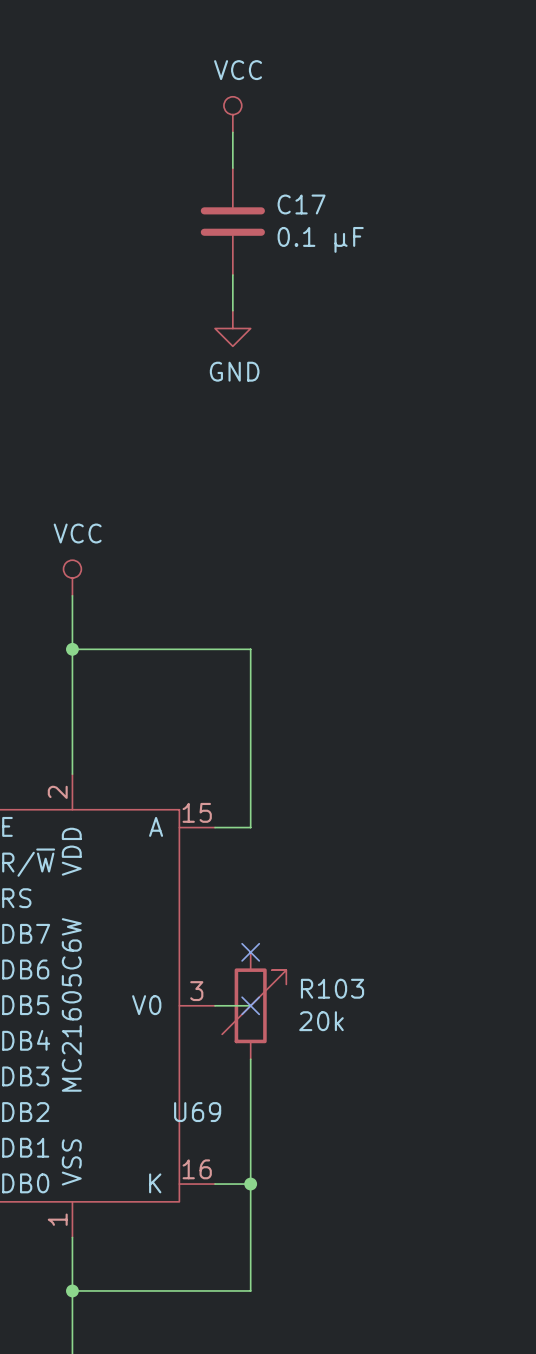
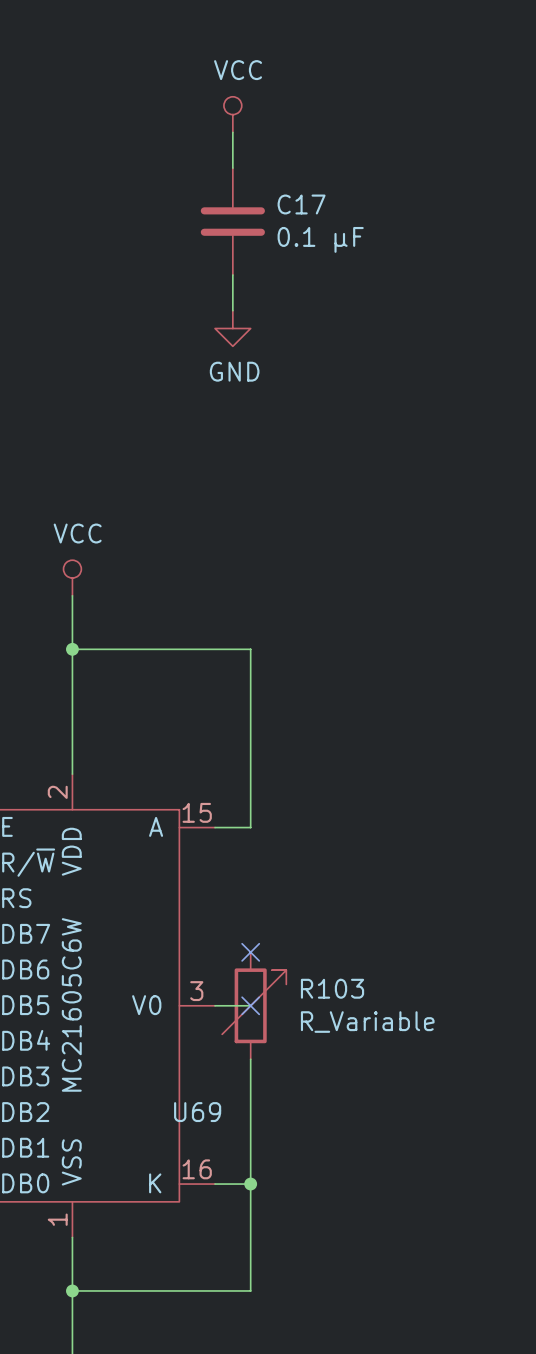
R103 value: 20k (321, 1021) -> R_Variable (367, 1022)

